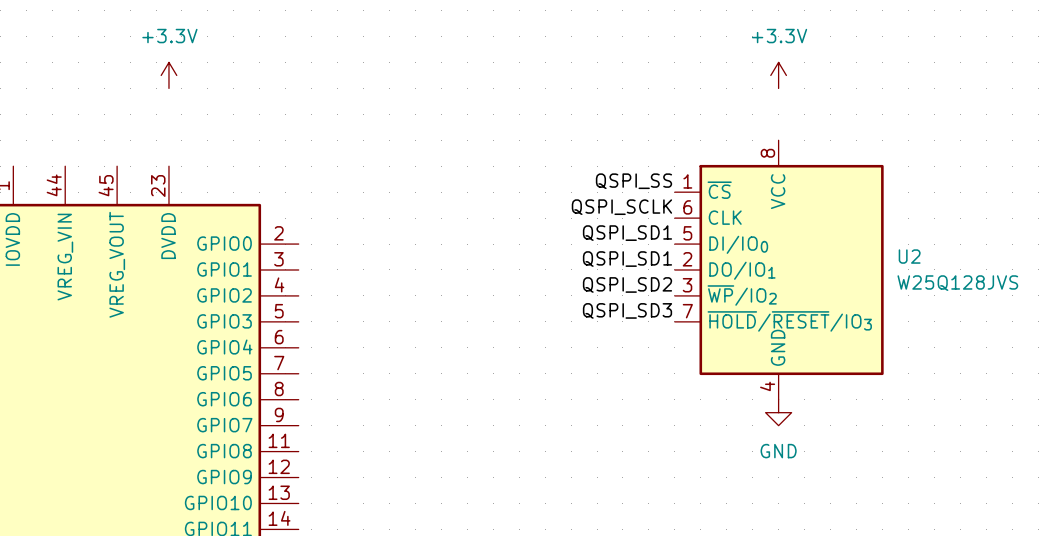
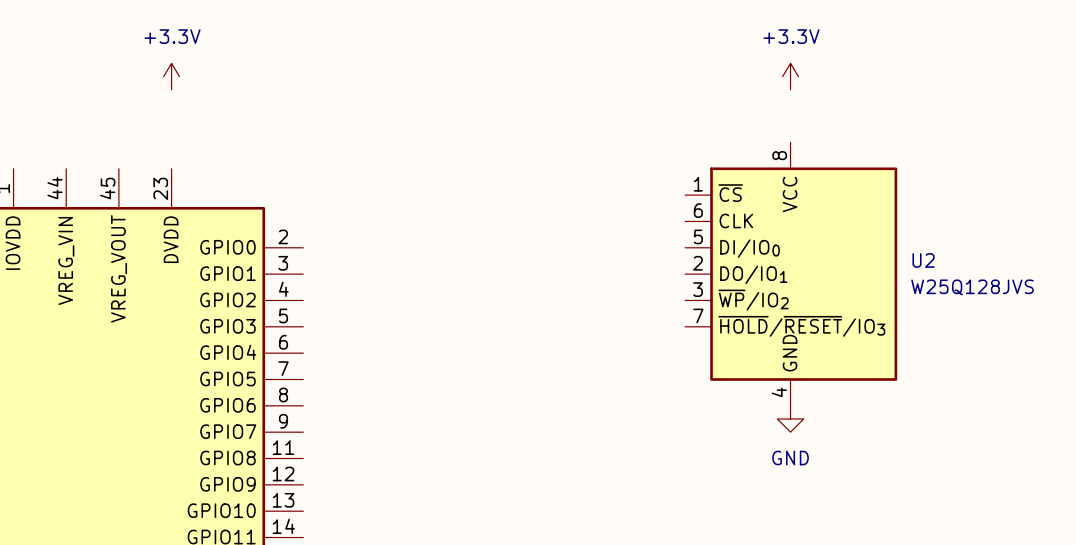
label: QSPI_SS (633, 181) -> none
label: QSPI_SCLK (621, 207) -> none
label: QSPI_SD1 (627, 233) -> none
label: QSPI_SD1 (627, 259) -> none
label: QSPI_SD2 (627, 284) -> none
label: QSPI_SD3 (627, 310) -> none

